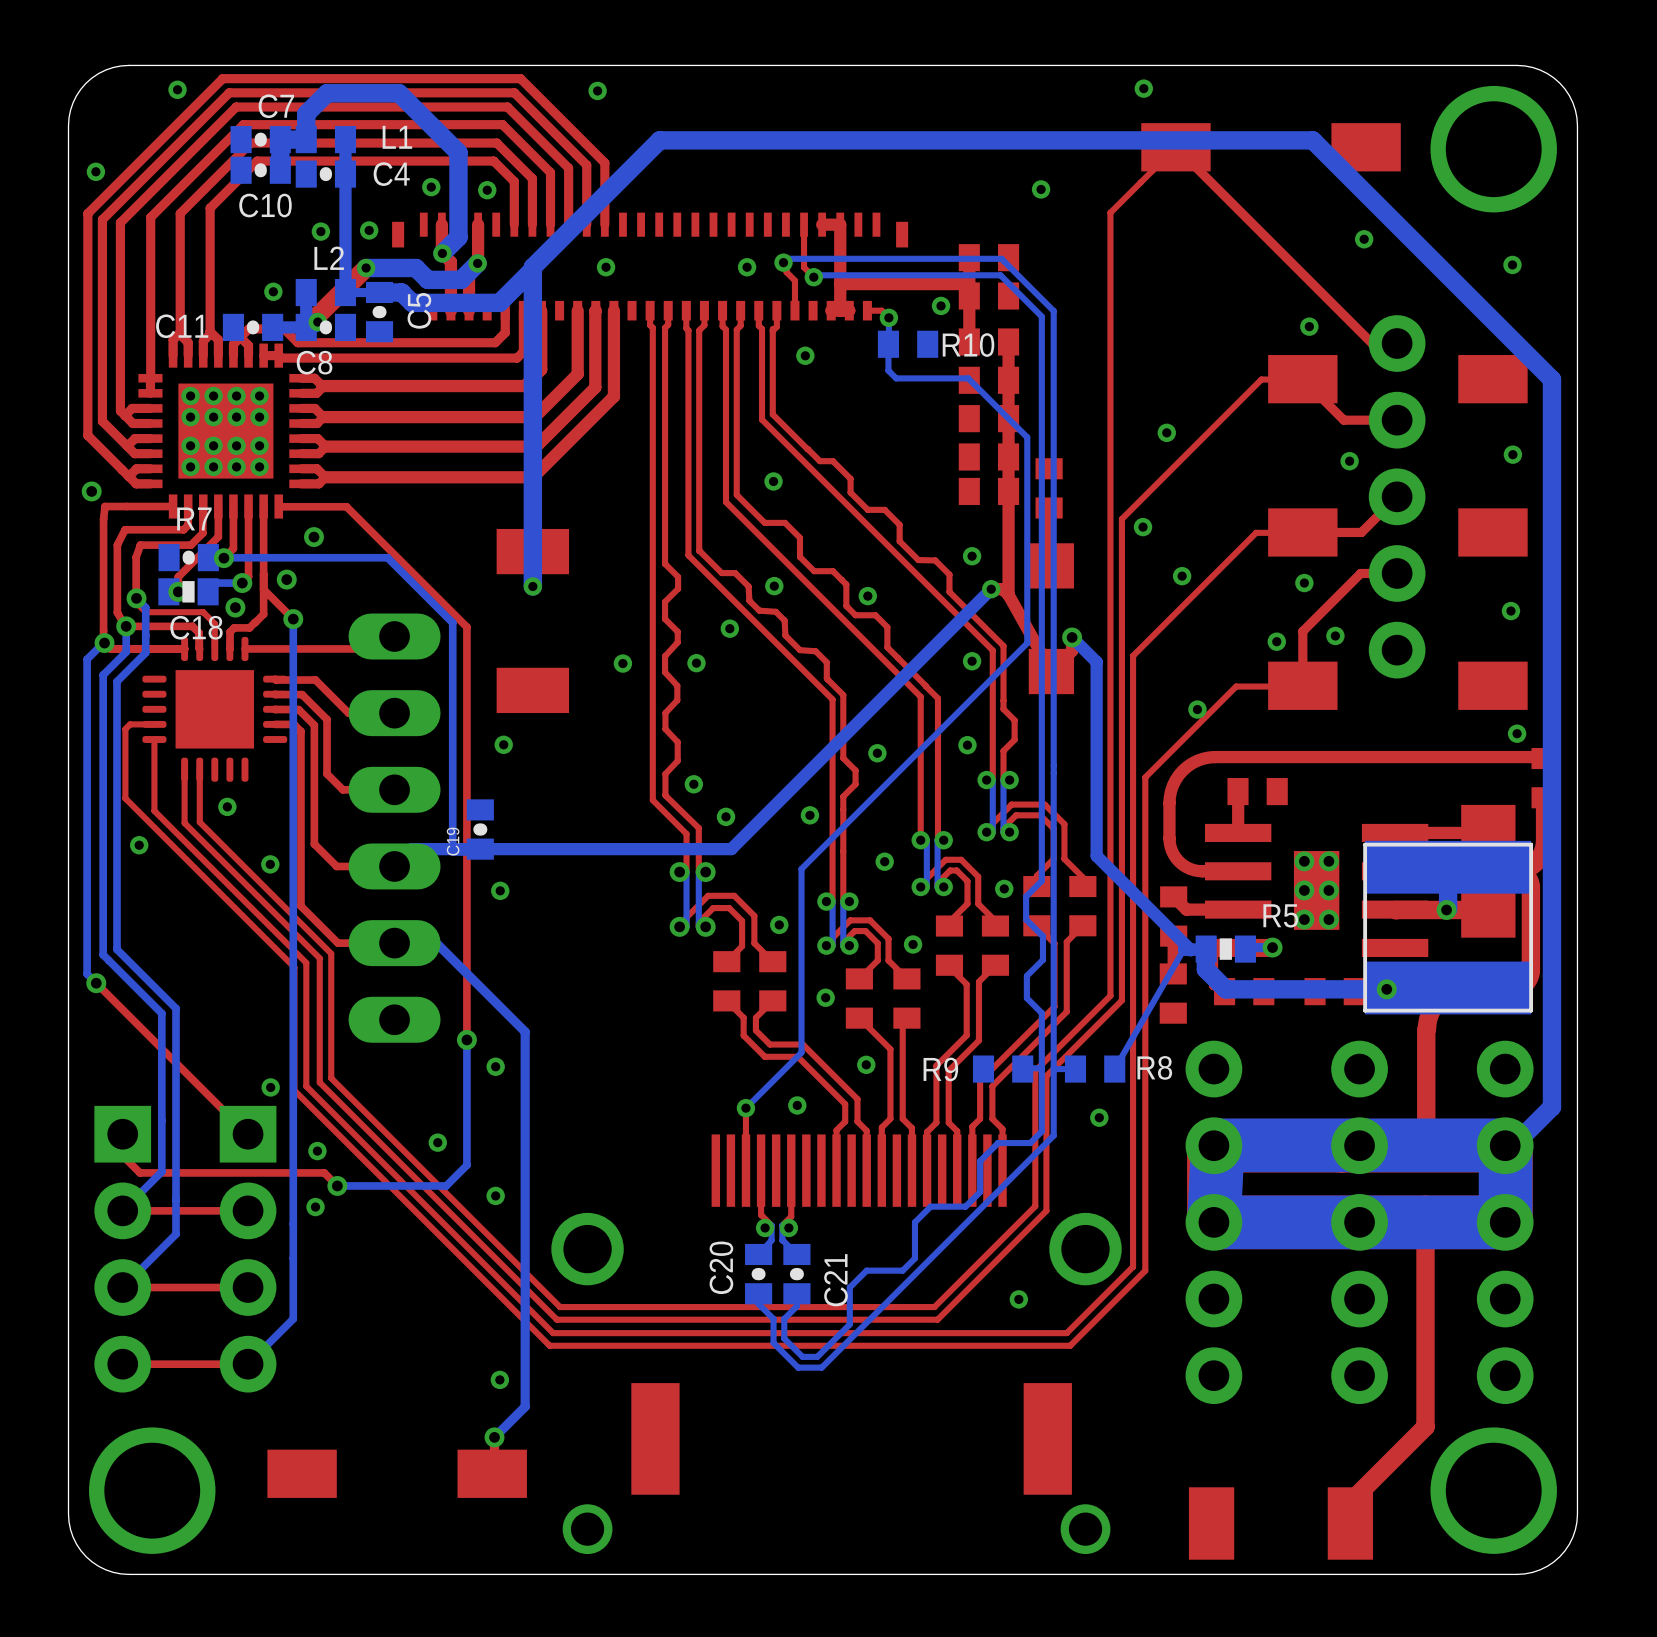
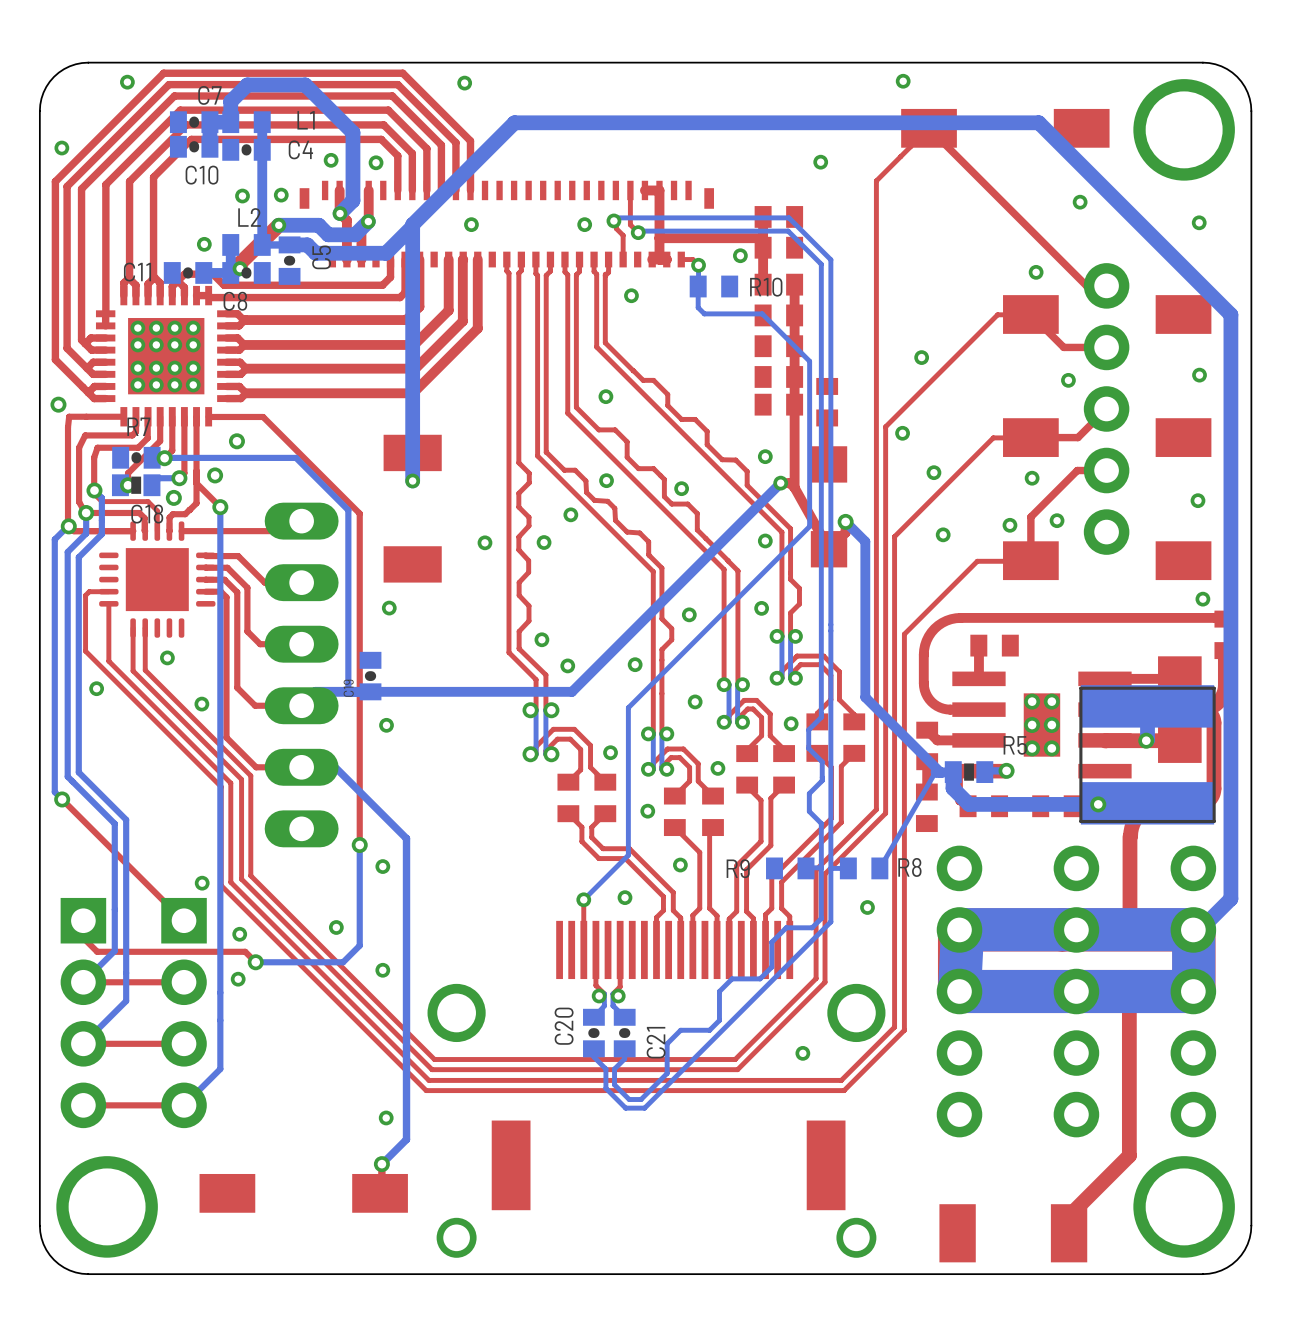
via position: (1197, 709) -> (943, 534)

